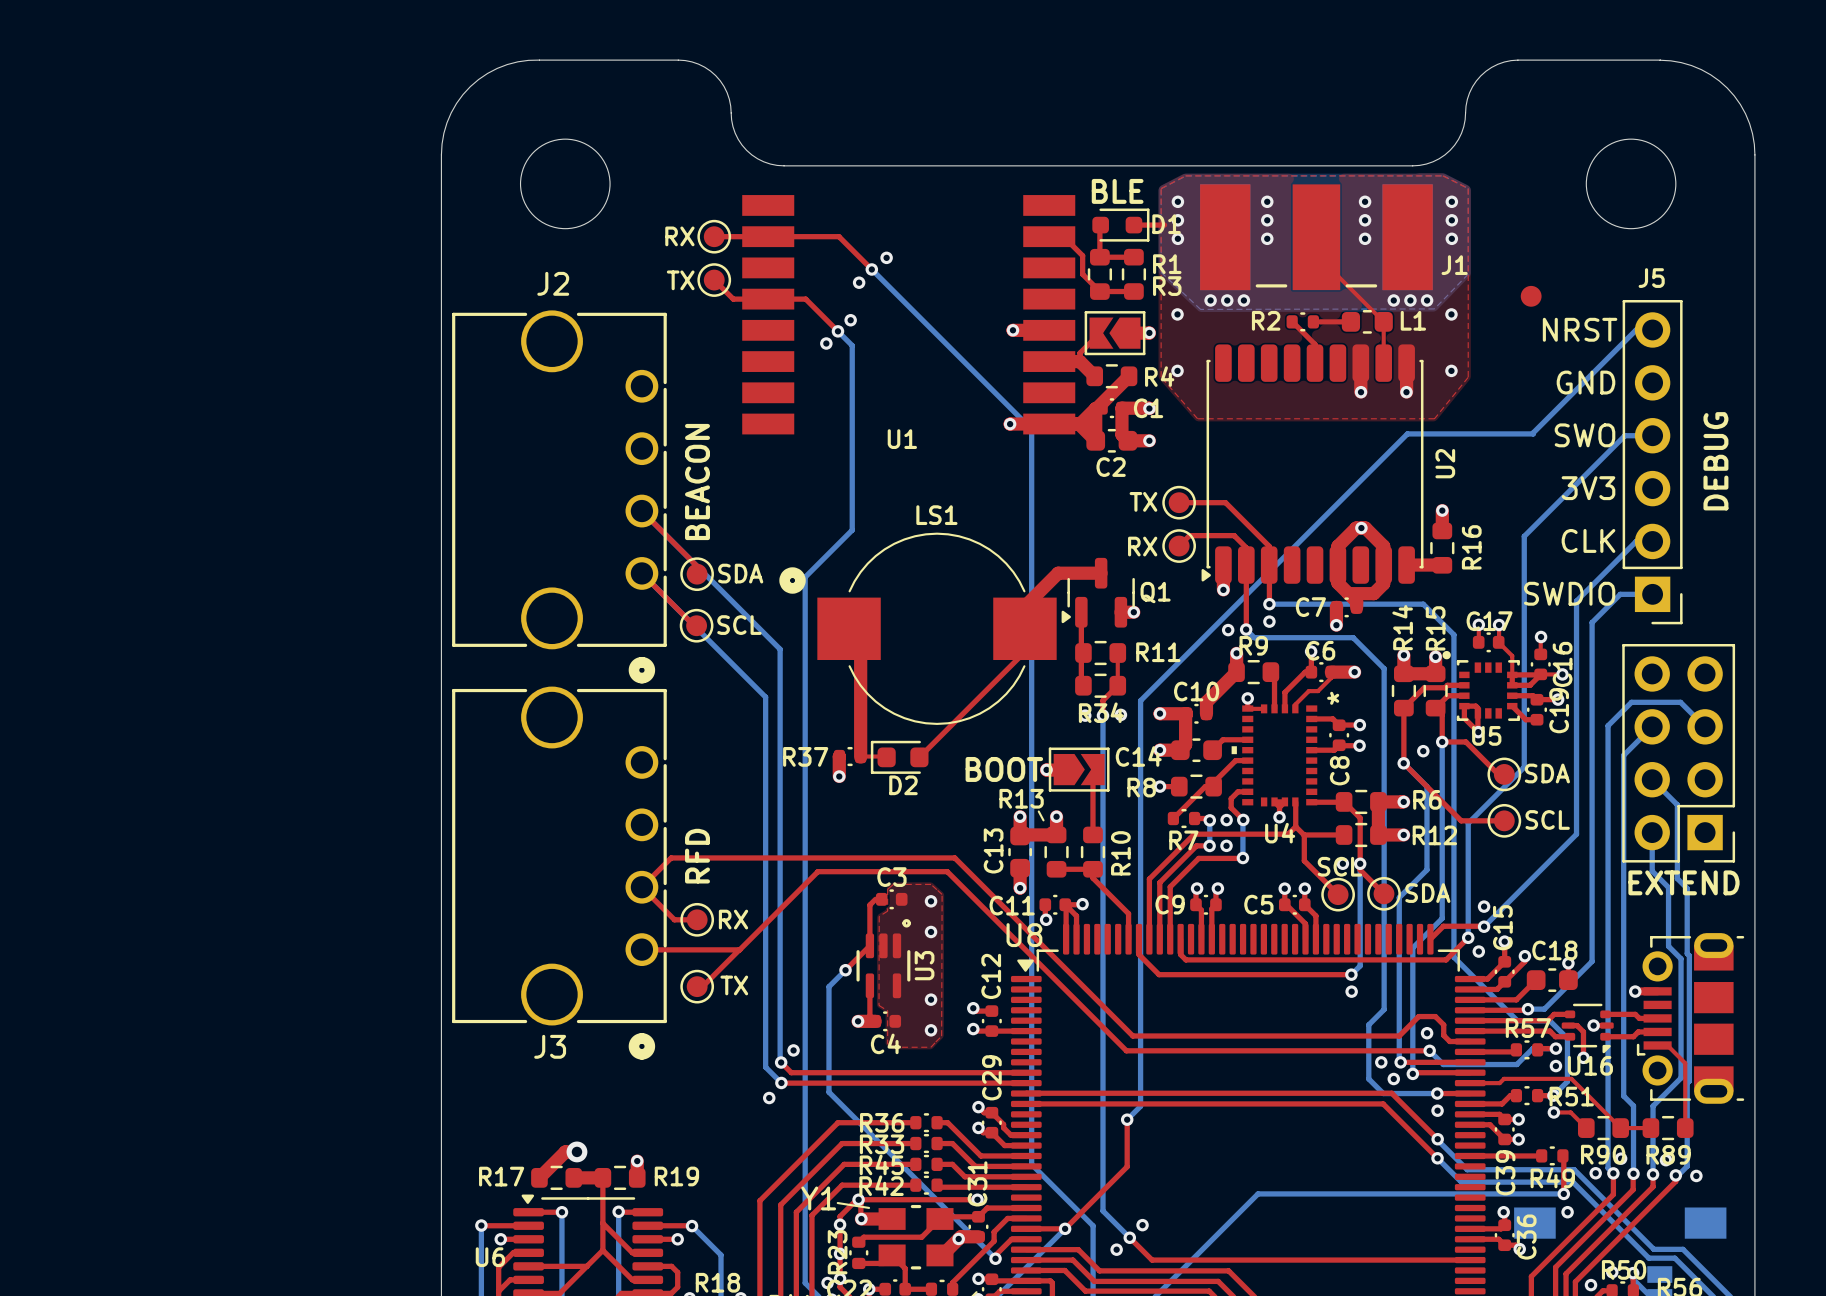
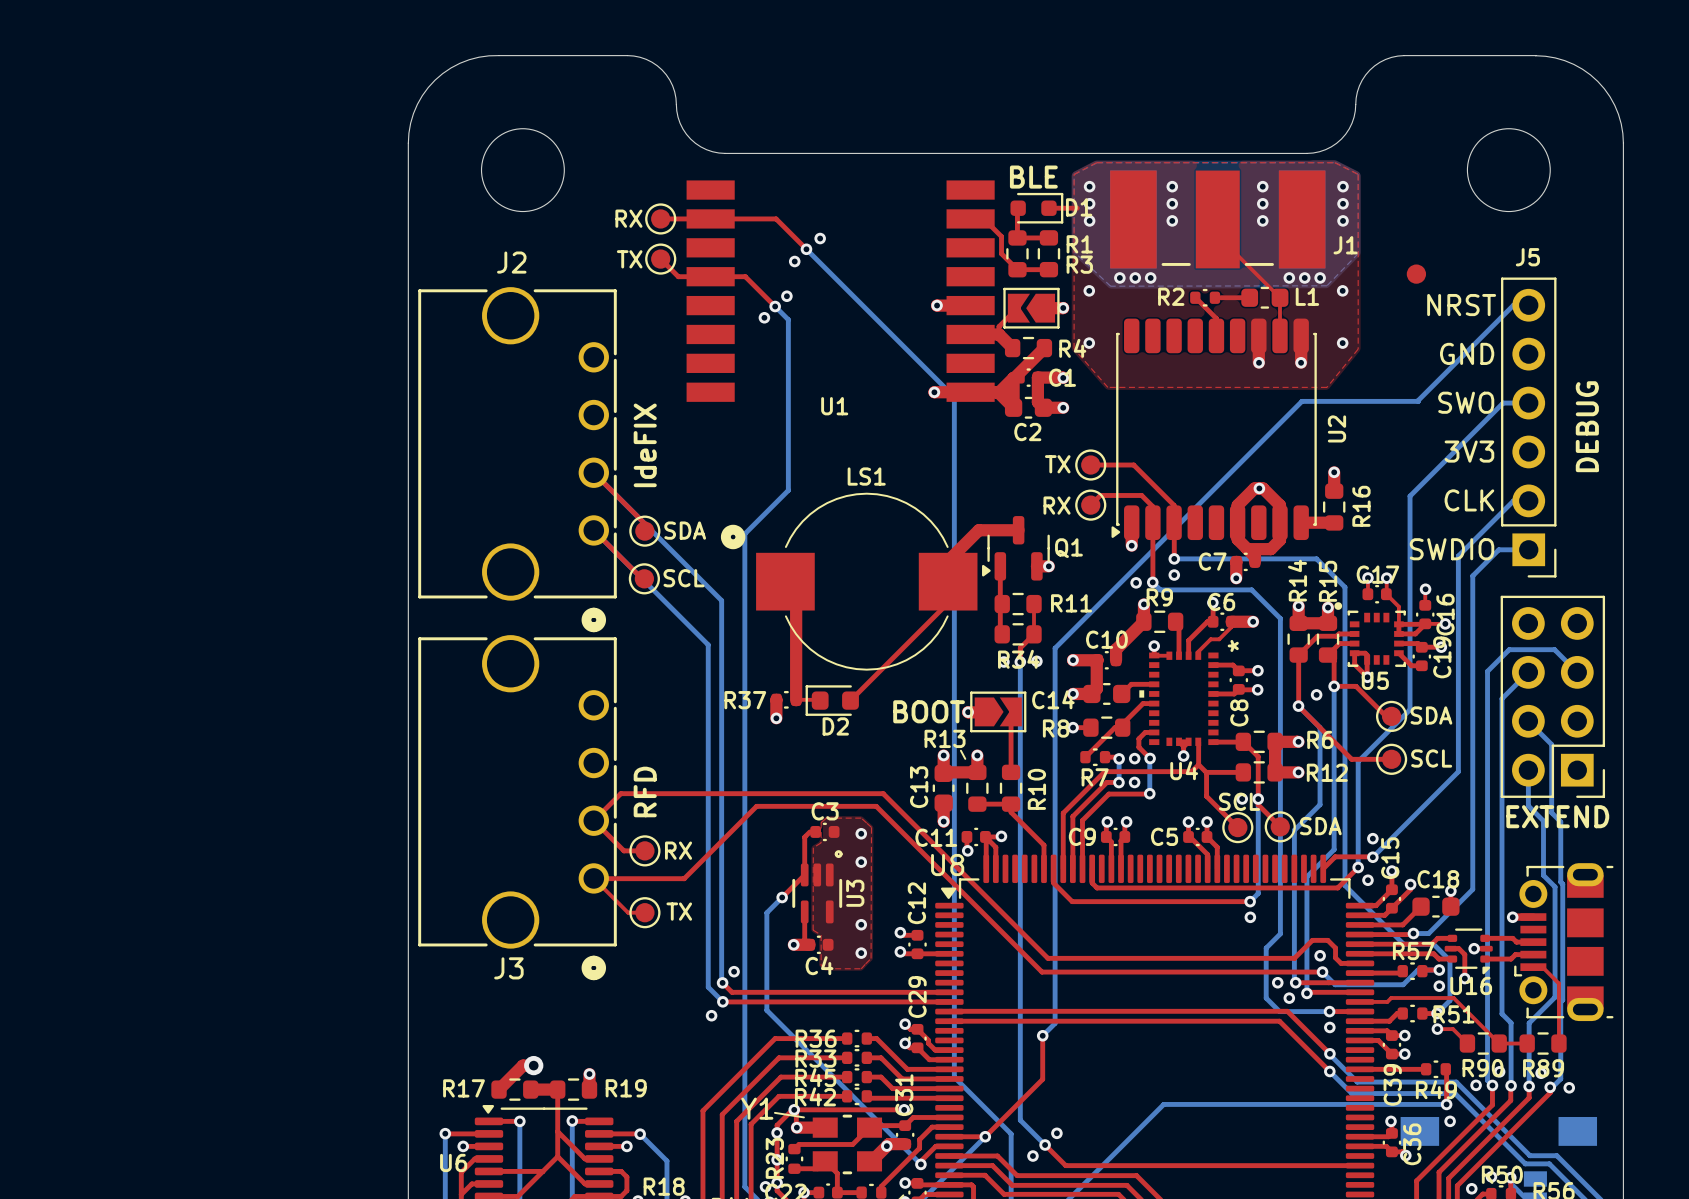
text: BEACON (697, 482) -> IdeFIX (645, 445)
top track: none -> (593, 878) (628, 912) (644, 912)
top track: (739, 949) (702, 986) -> none

